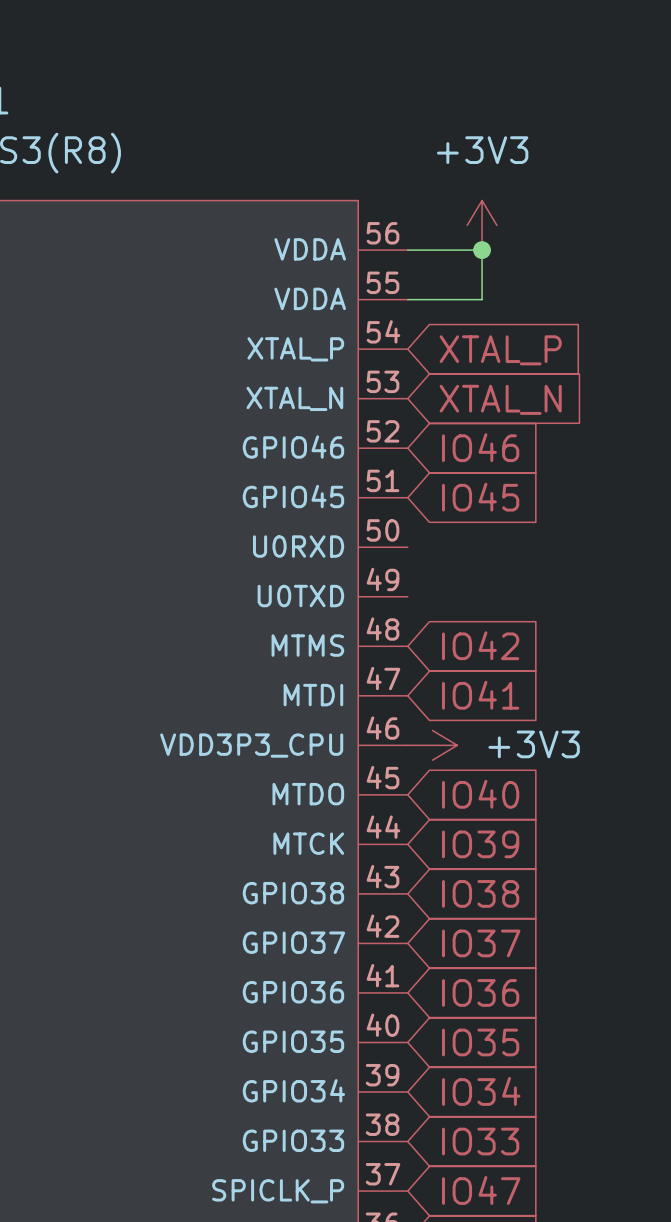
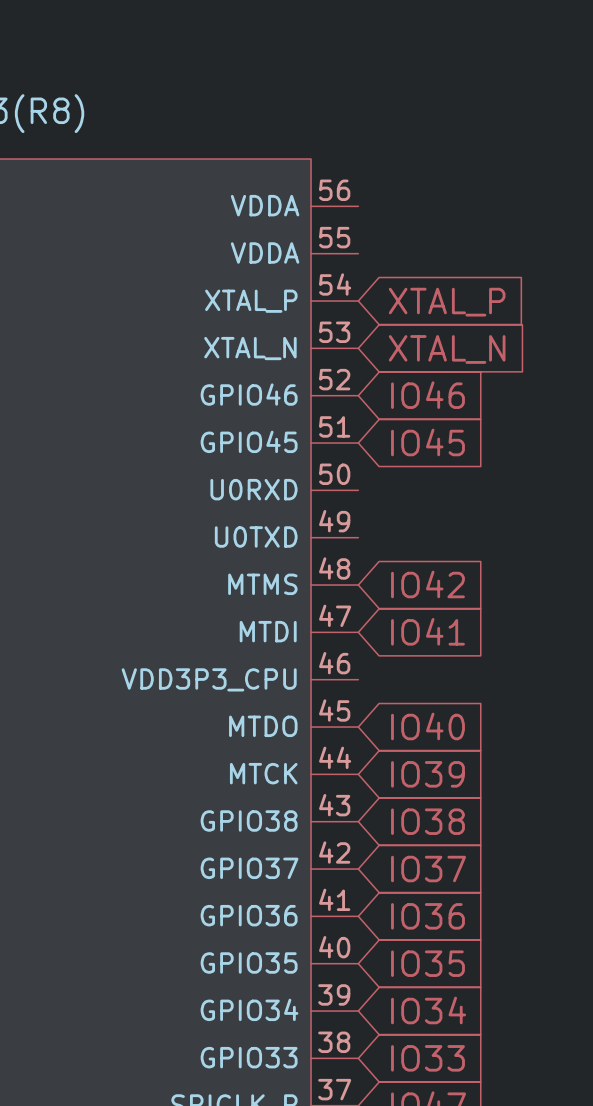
power symbol: +3V3 (482, 225) -> none
wire: (407, 250) (482, 250) (482, 299) (407, 299) -> none
junction: (482, 250) -> none
power symbol: +3V3 (432, 745) -> none

